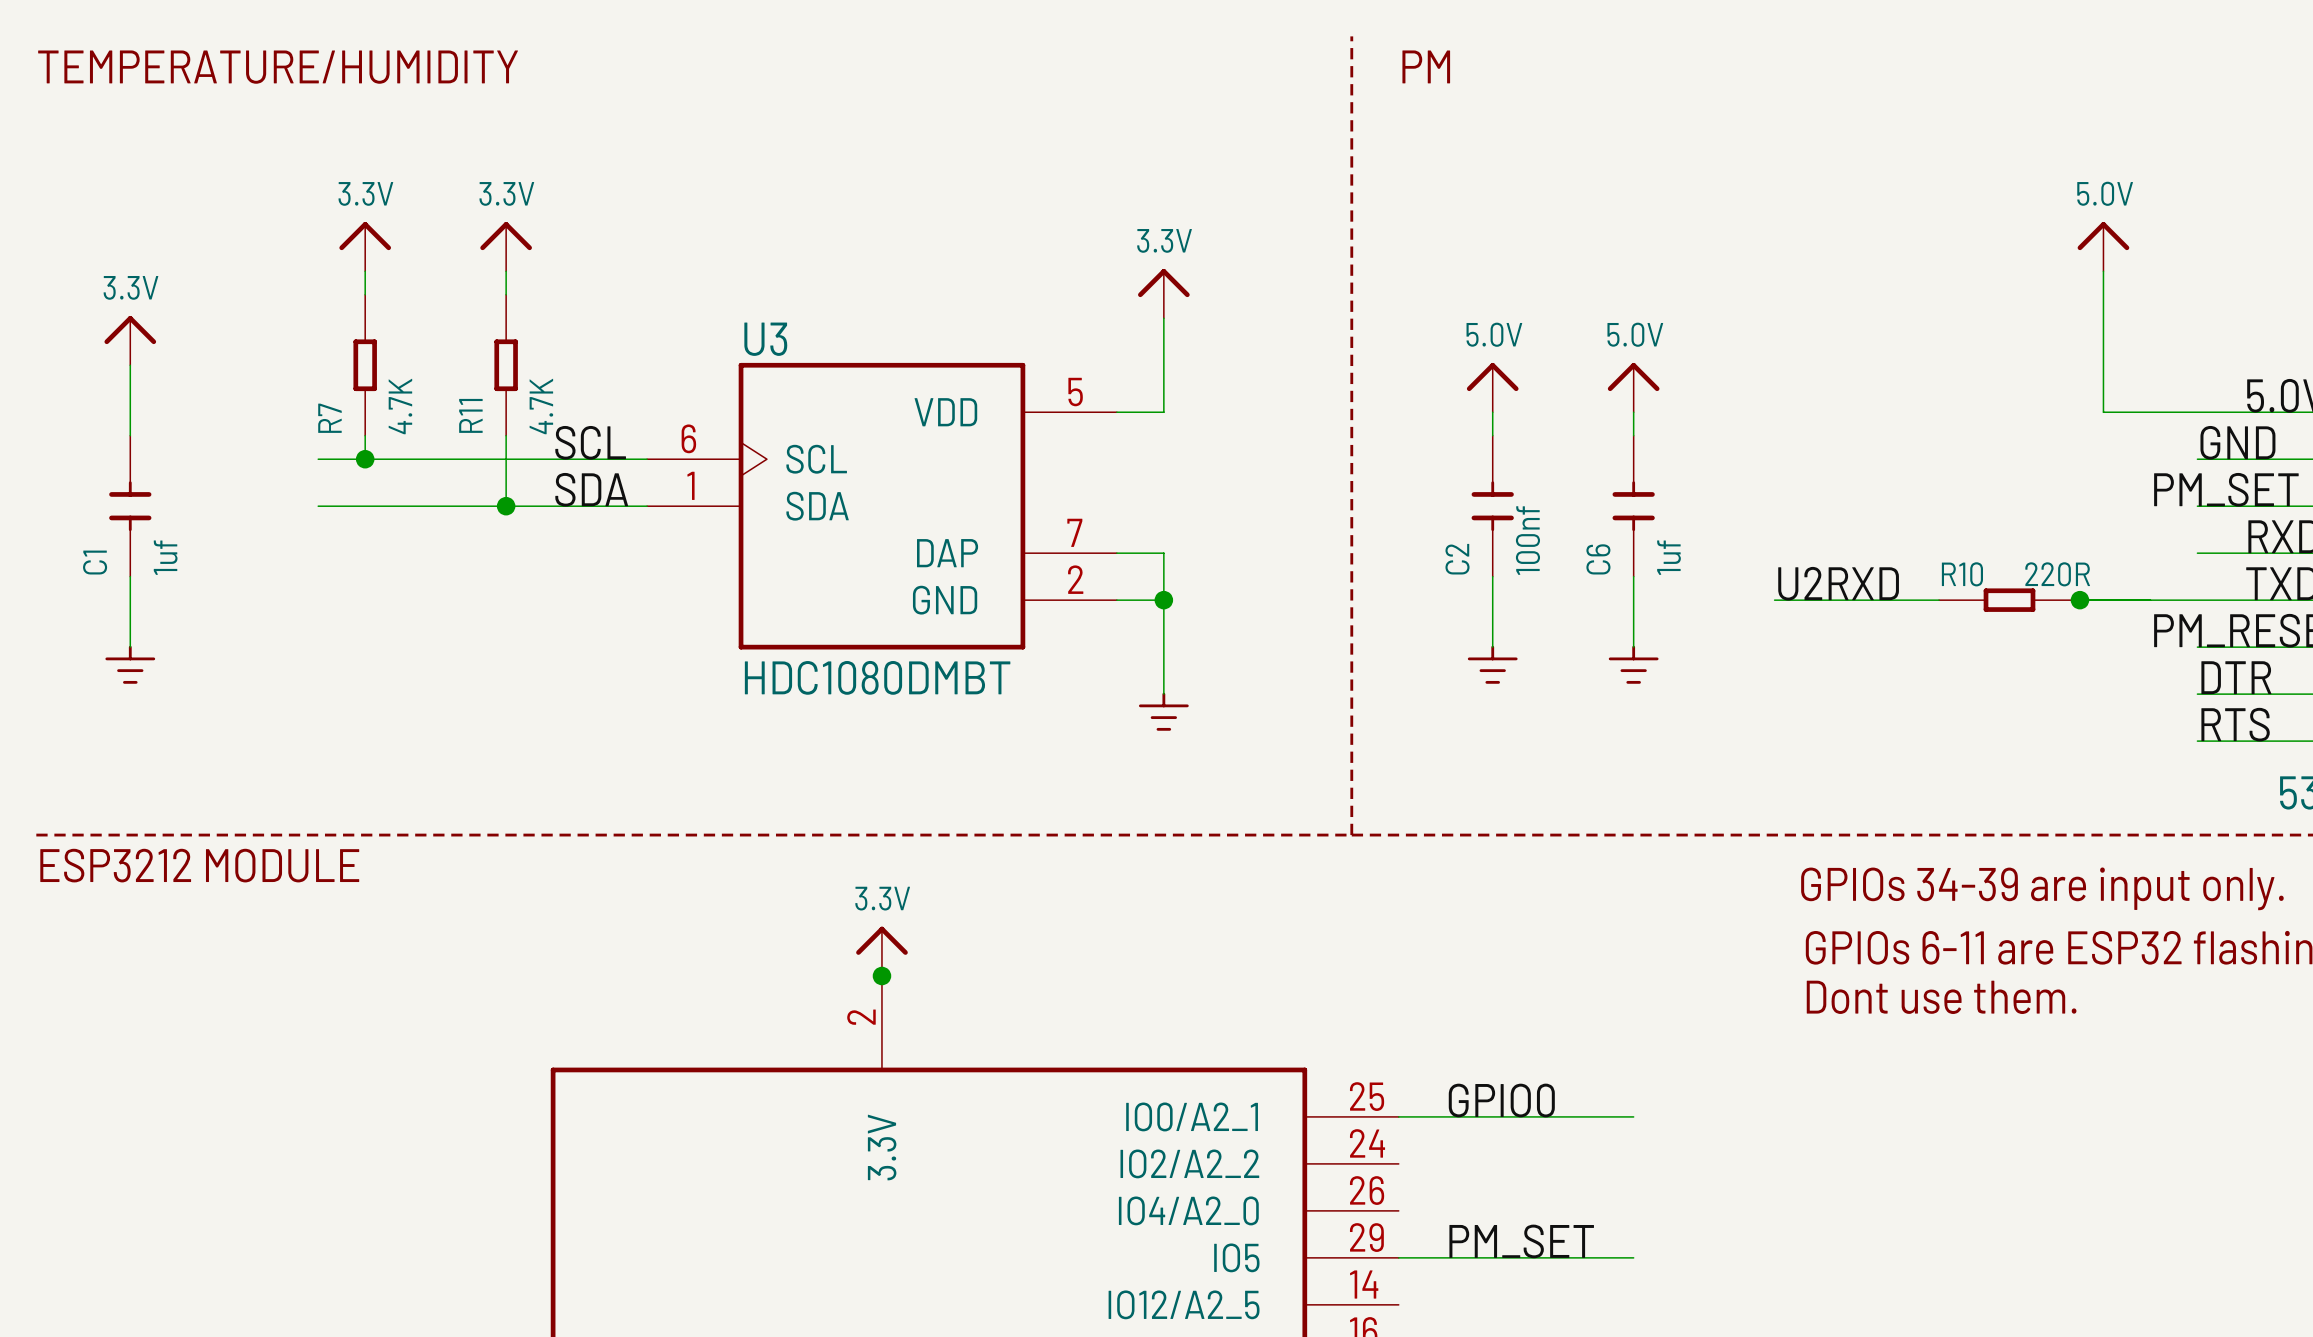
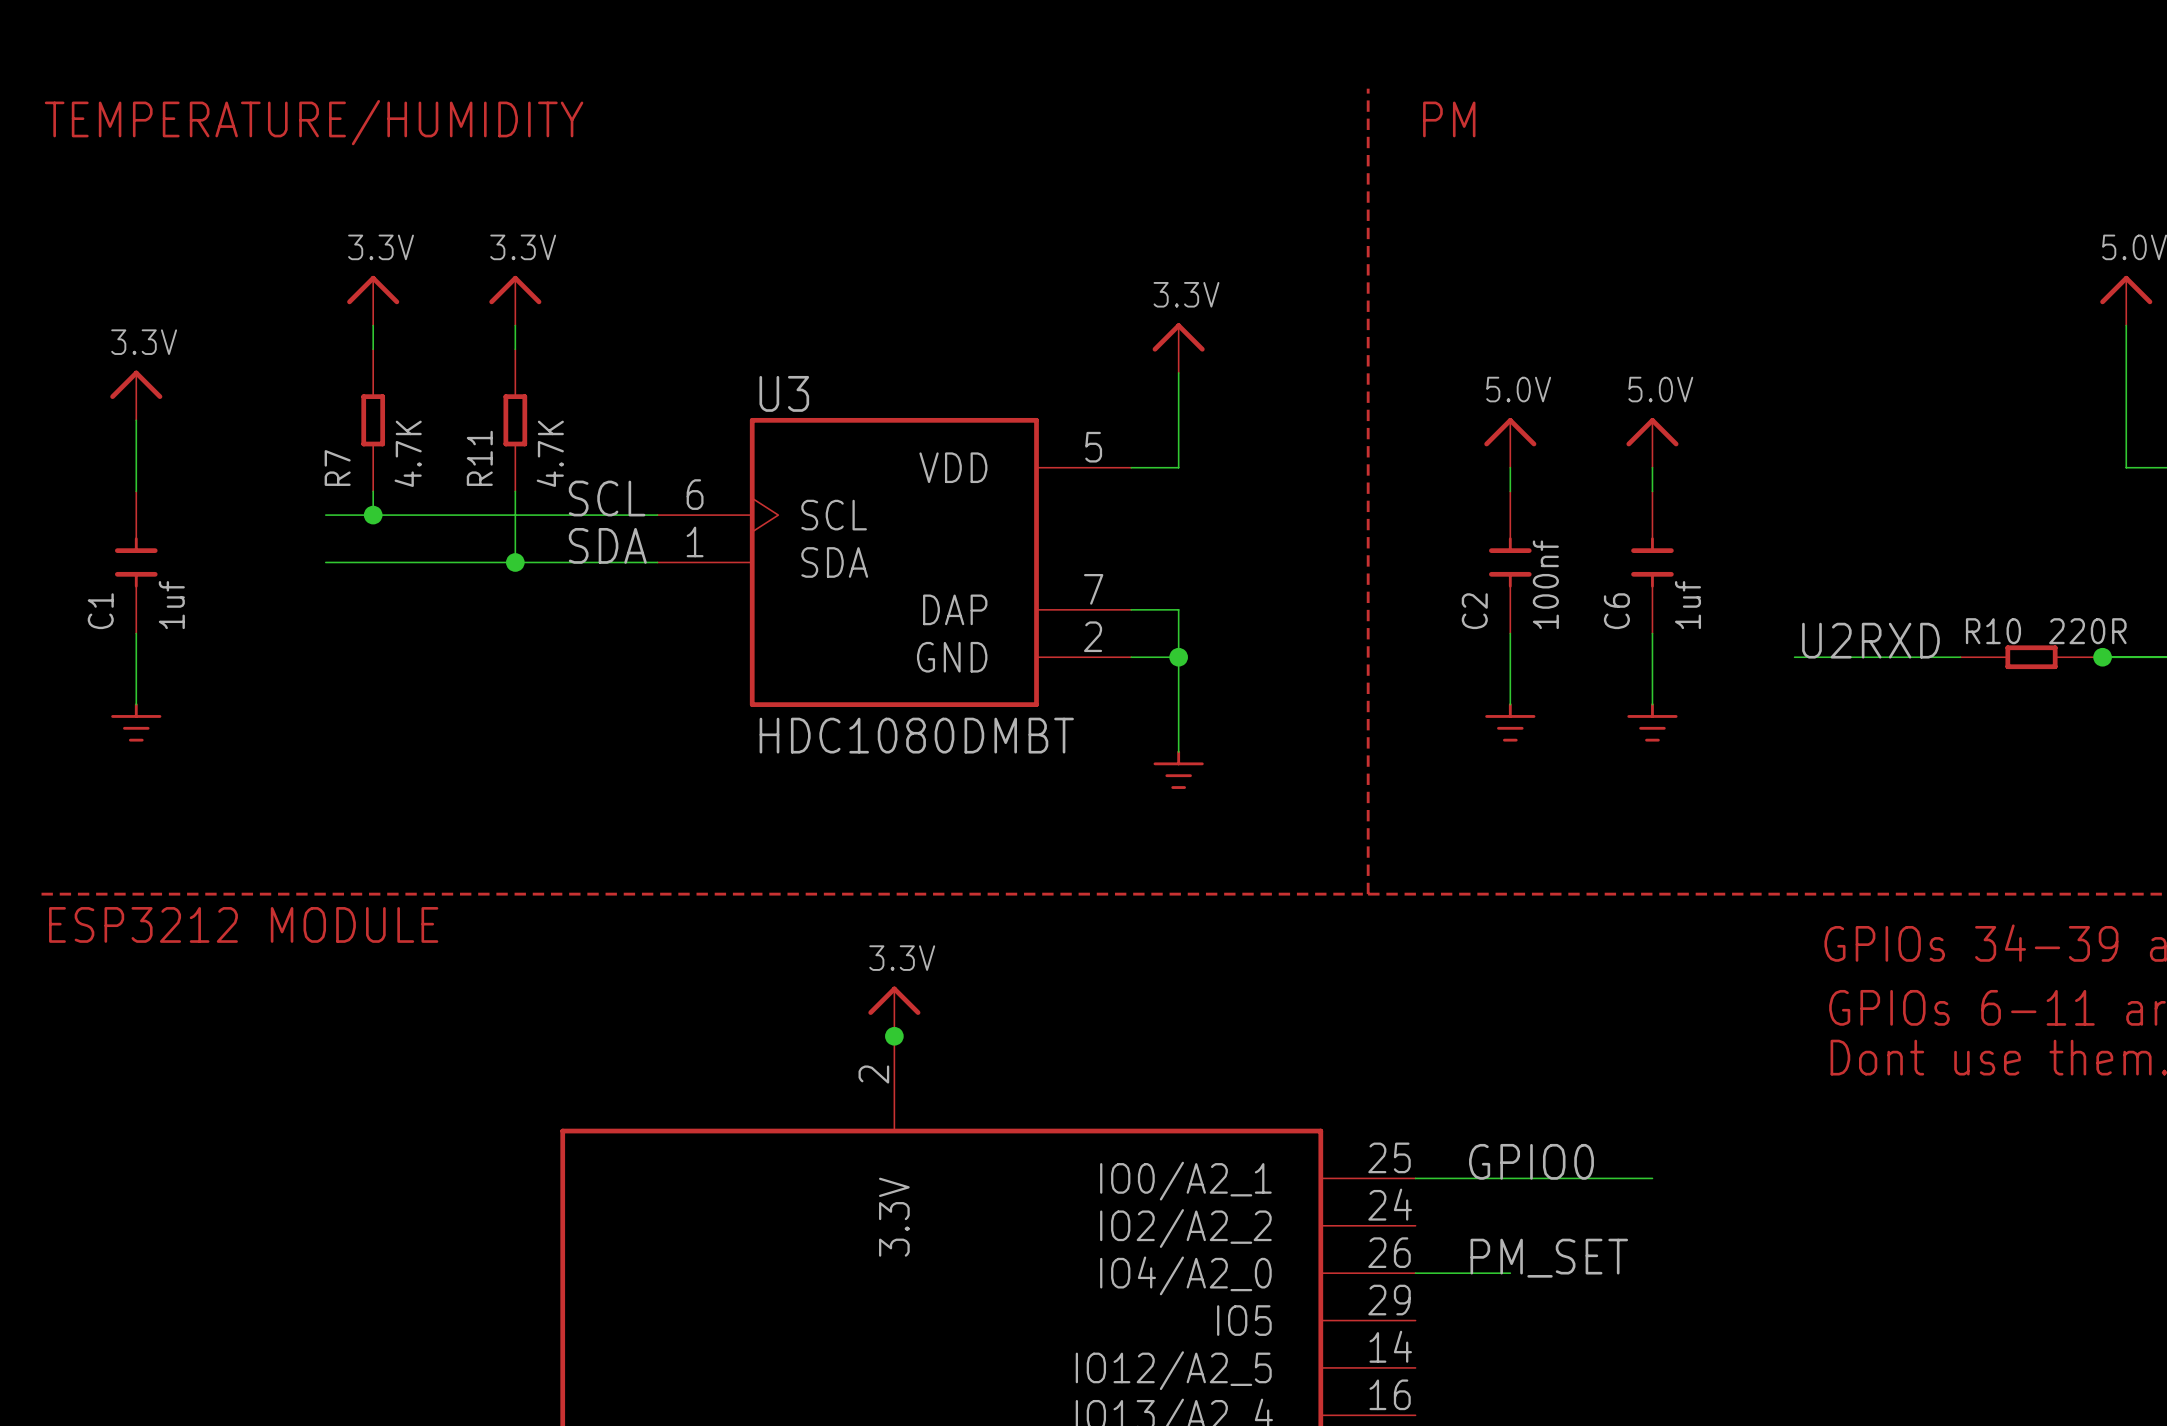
wire: none -> (1415, 1273) (1510, 1273)
label position: PM_SET (1521, 1241) -> PM_SET (1549, 1258)
wire: (1398, 1257) (1633, 1257) -> none

